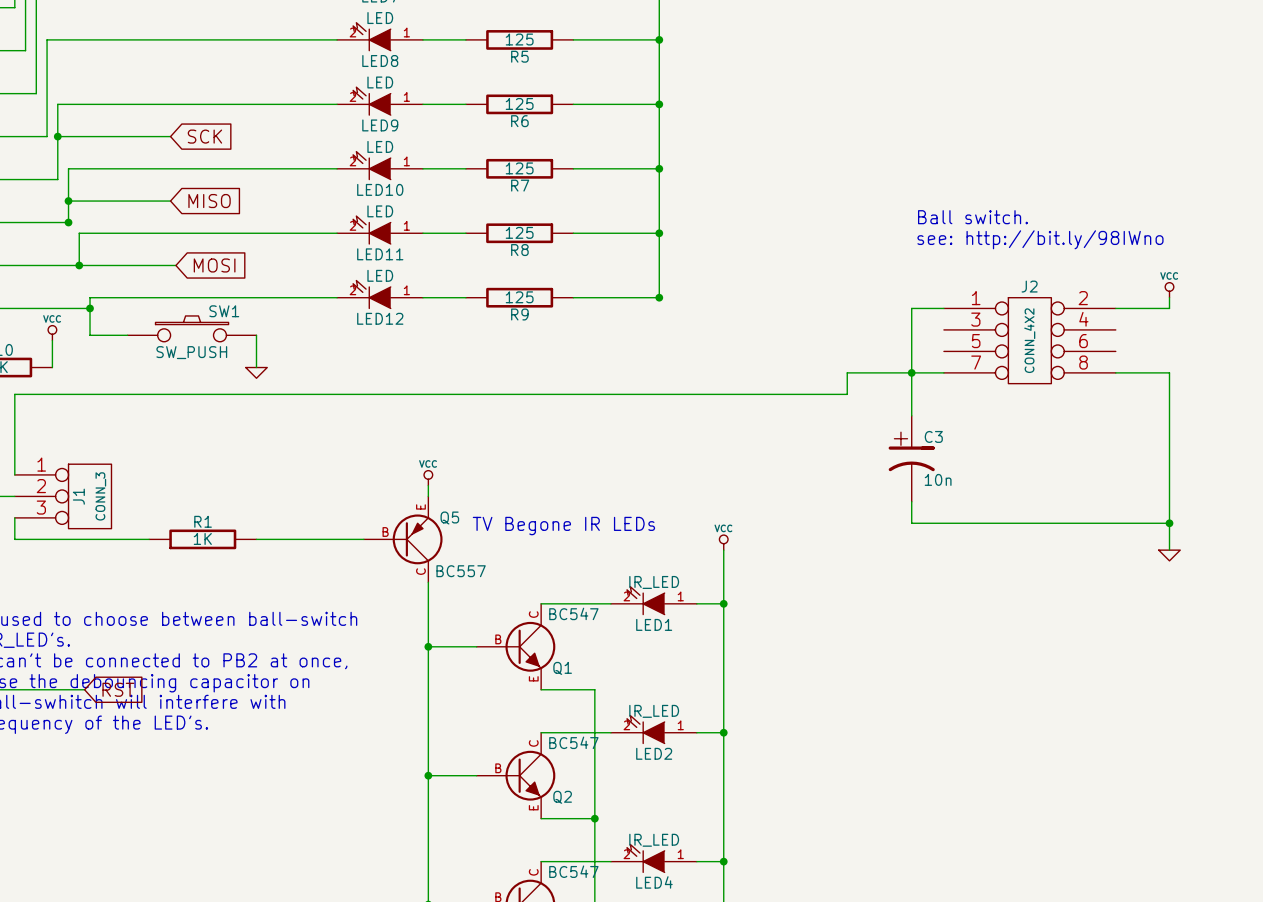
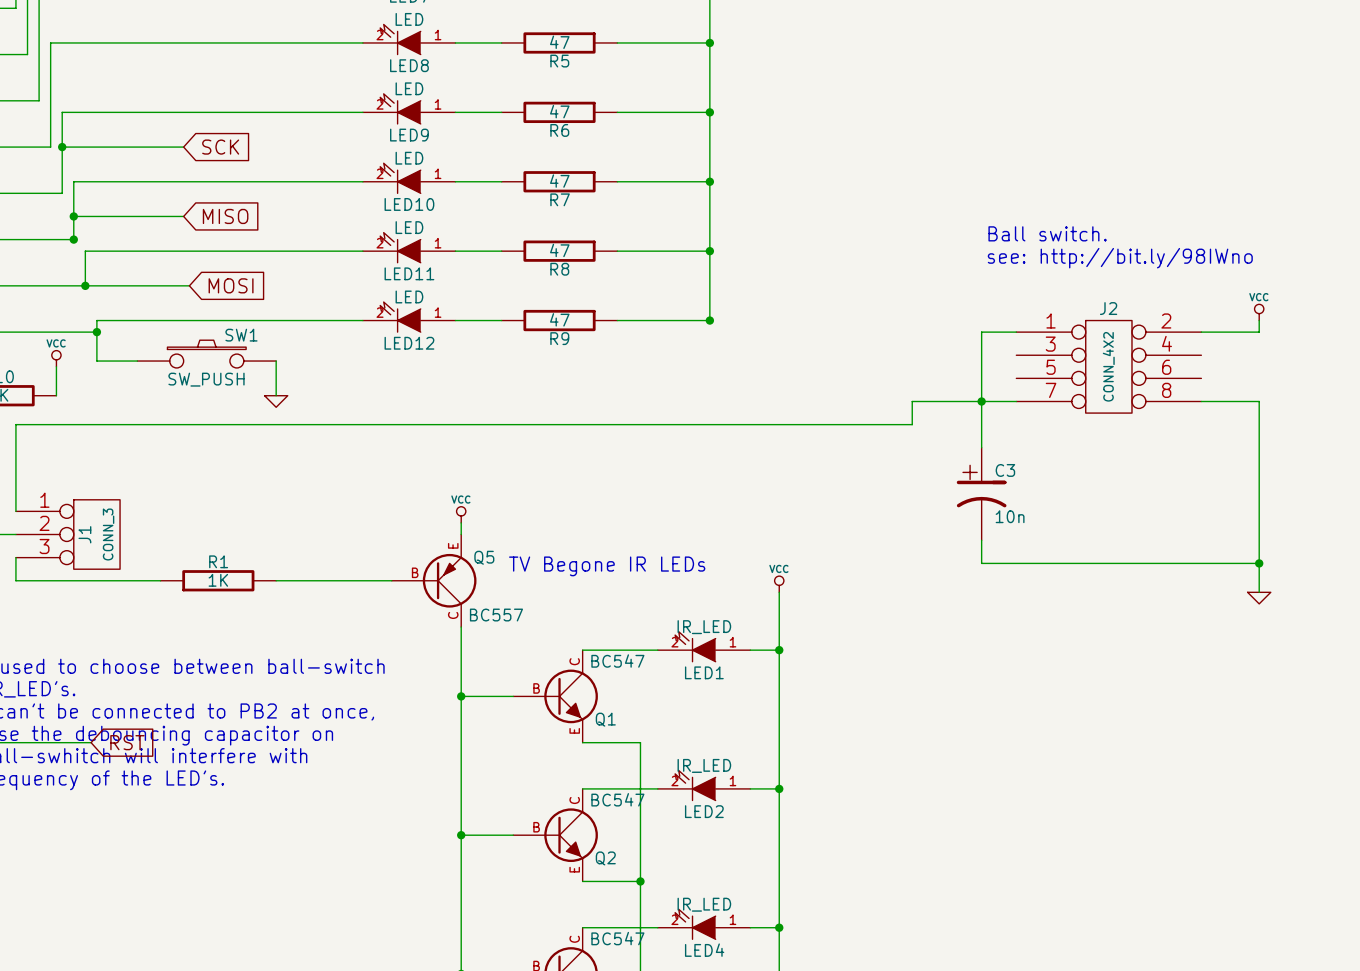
R5 value: 125 (519, 39) -> 47 (559, 42)
R6 value: 125 (519, 103) -> 47 (559, 111)
R7 value: 125 (519, 168) -> 47 (559, 181)
R8 value: 125 (519, 232) -> 47 (559, 250)
R9 value: 125 (519, 297) -> 47 (559, 319)

